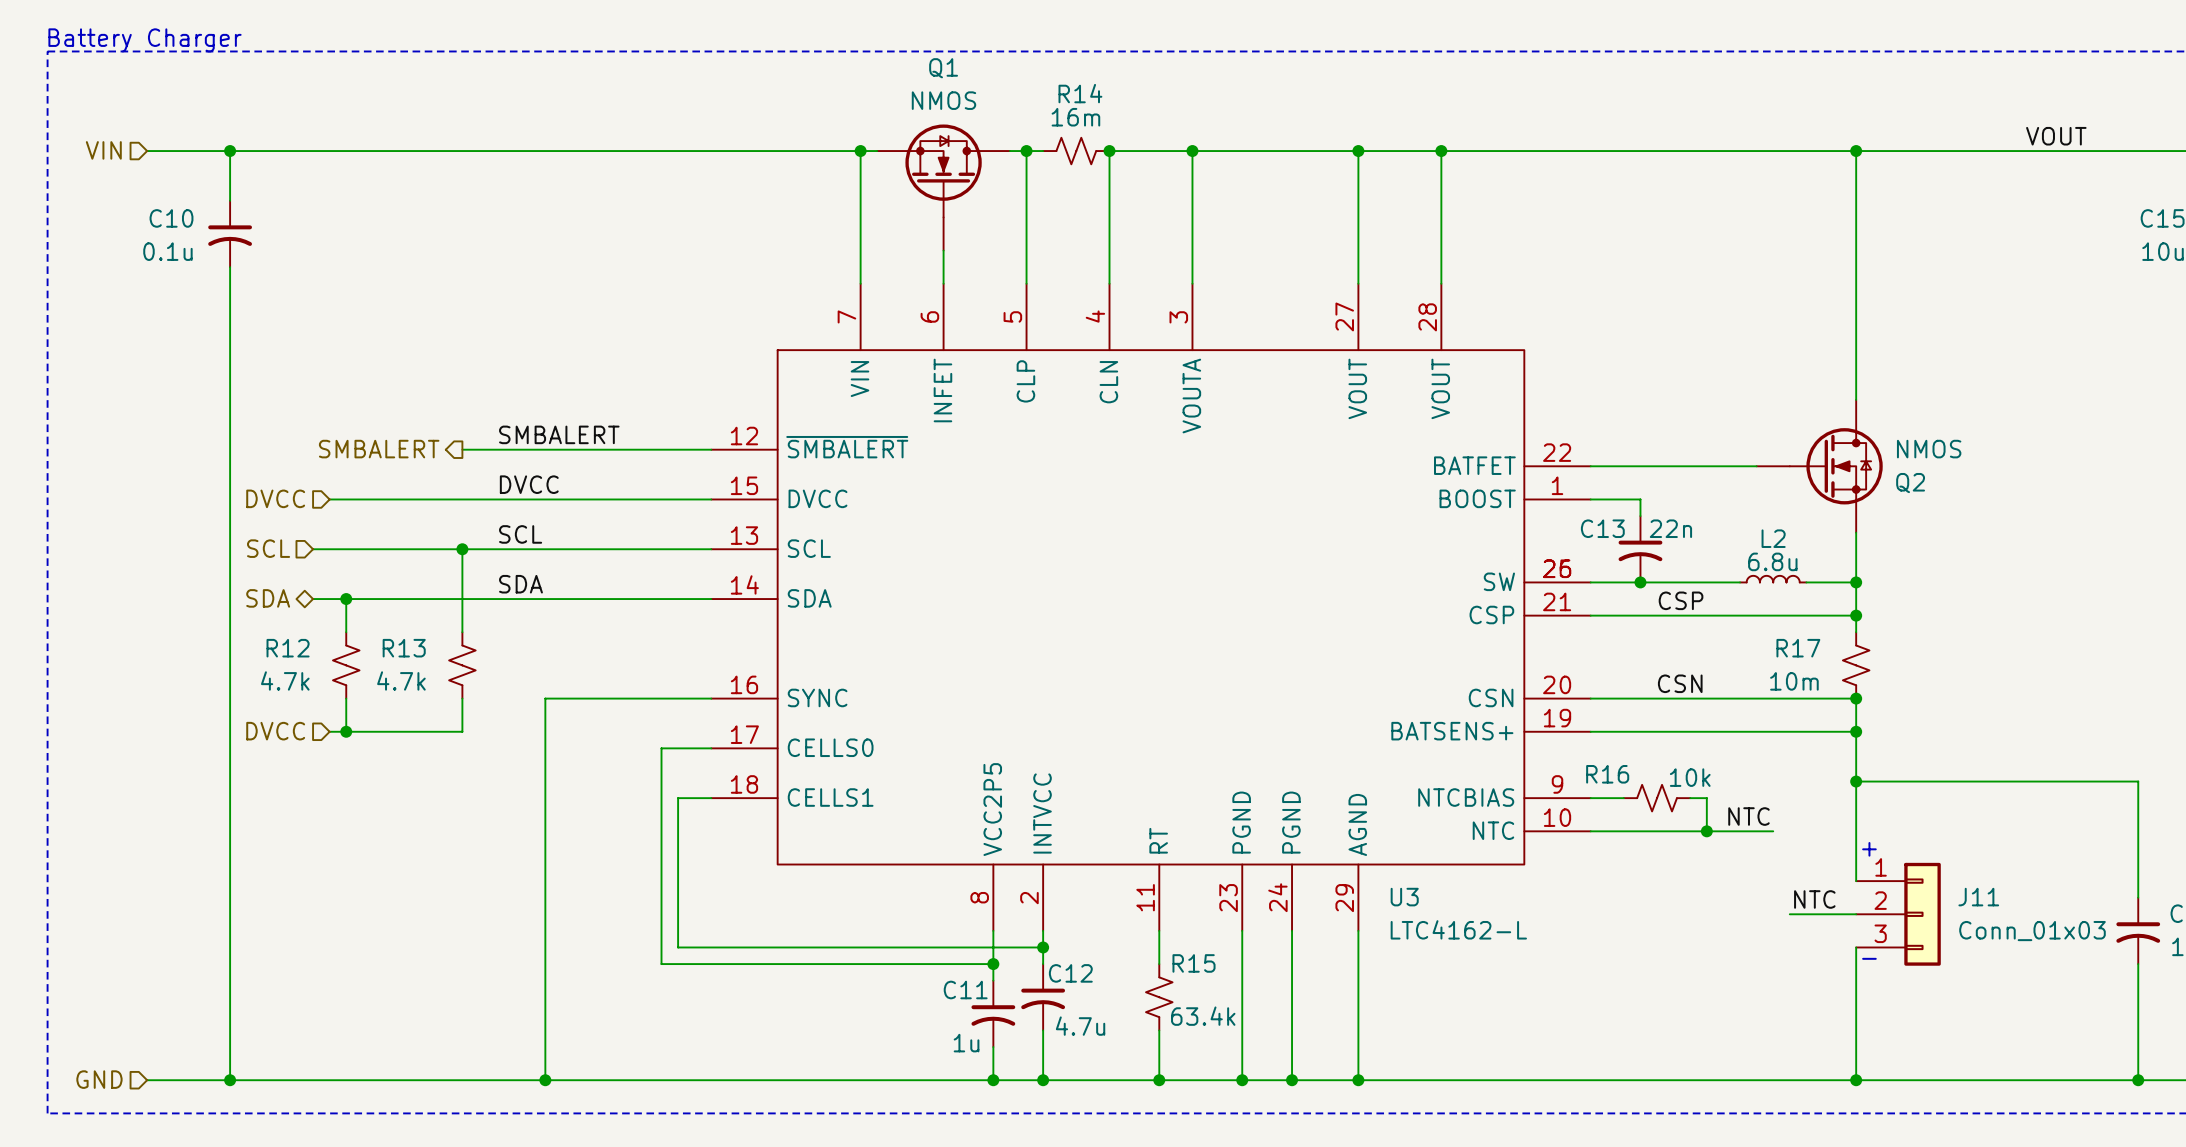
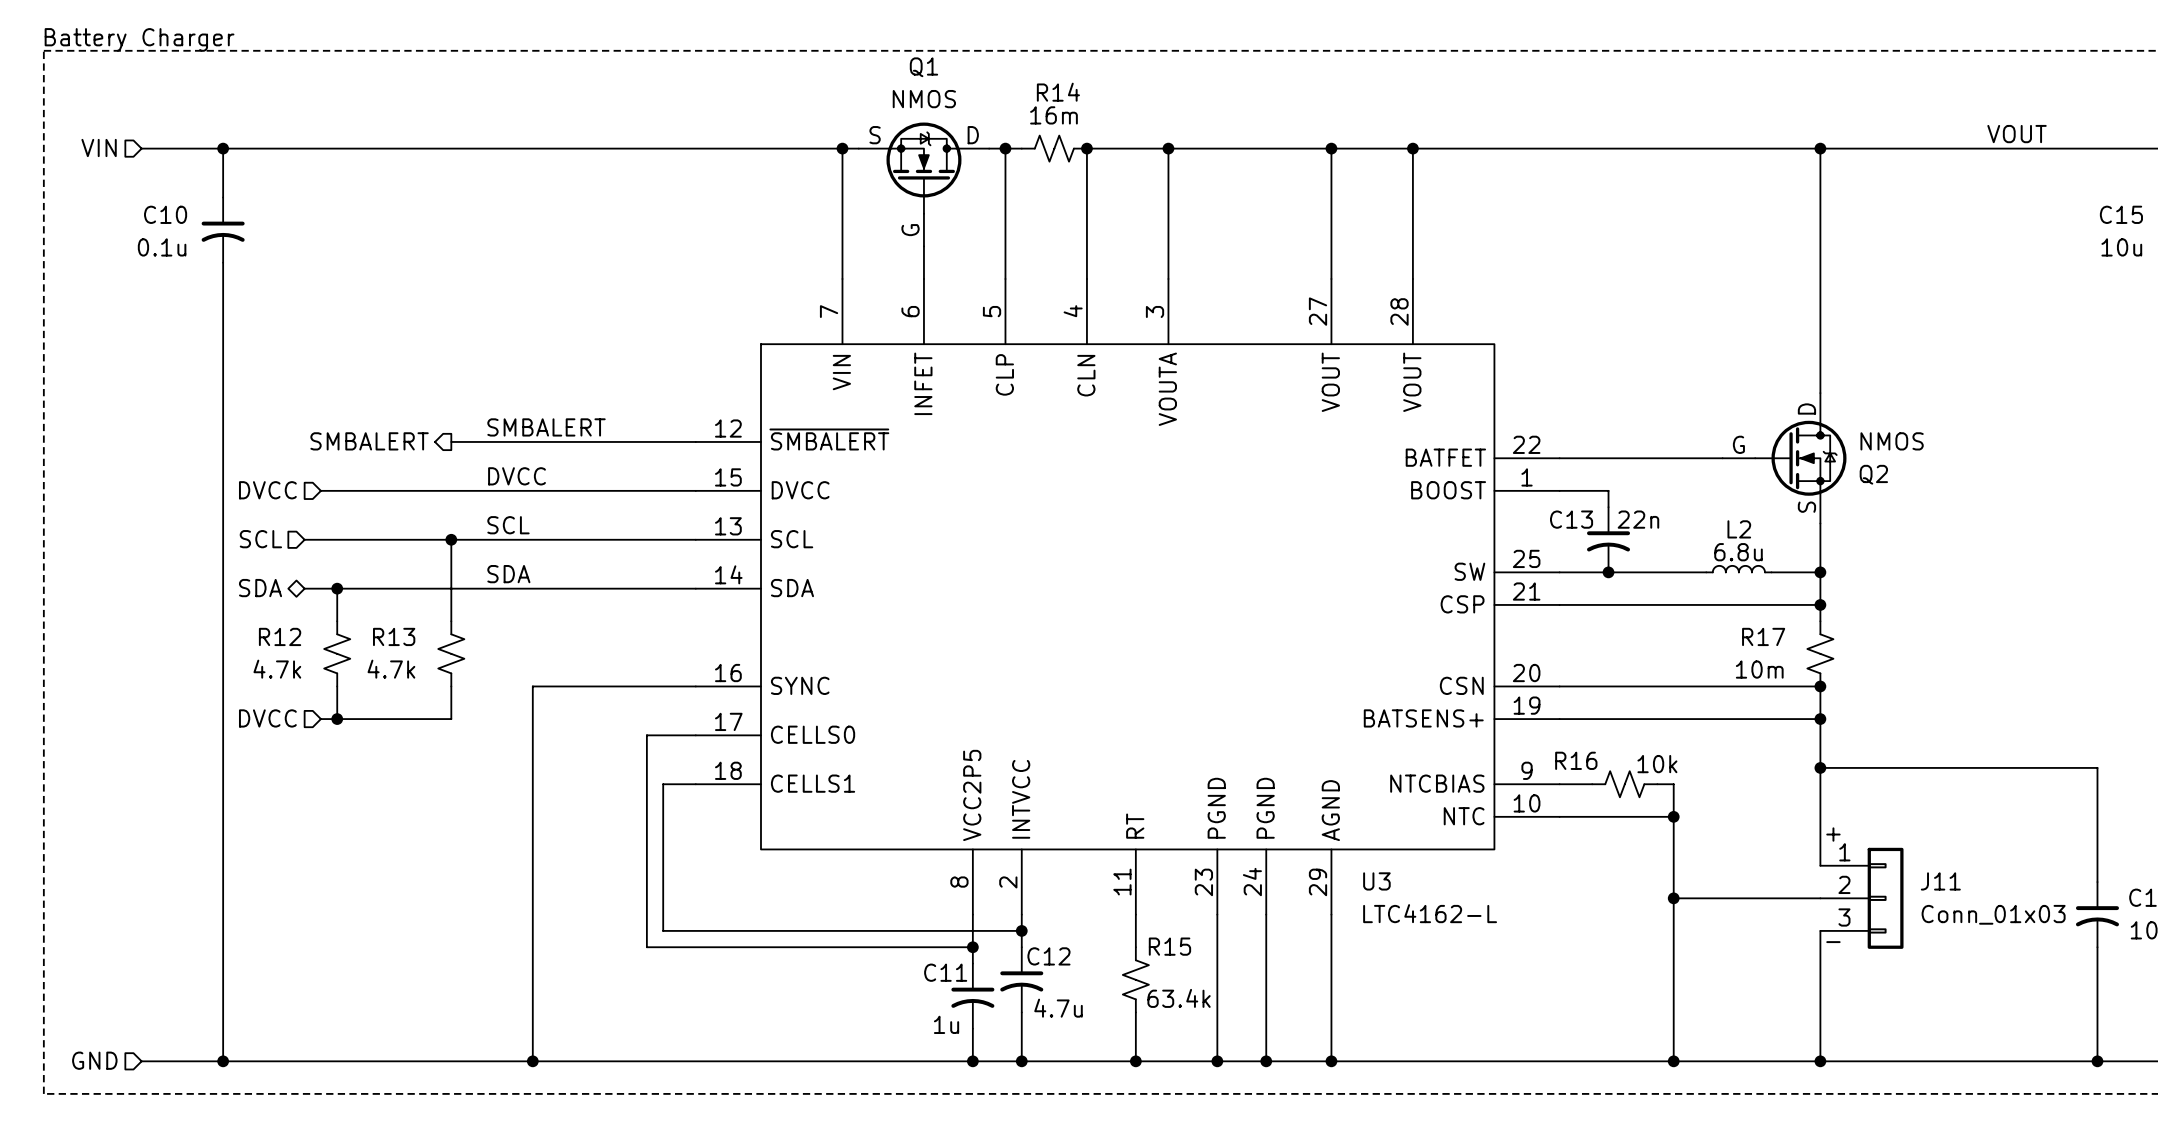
Q1 symbol: [877, 124, 1010, 251] -> [858, 122, 990, 247]
U3 symbol: [711, 283, 1591, 931] -> [695, 278, 1560, 915]
Q2 symbol: [1756, 399, 1883, 533] -> [1722, 393, 1847, 524]
label: CSP (1681, 600) -> none
label: CSN (1680, 683) -> none
label: NTC (1748, 816) -> none
wire: (1706, 831) (1773, 831) -> (1673, 816) (1673, 1061)
label: NTC (1814, 899) -> none
wire: none -> (1673, 898) (1755, 898)
junction: none -> (1673, 898)
junction: none -> (1673, 1061)

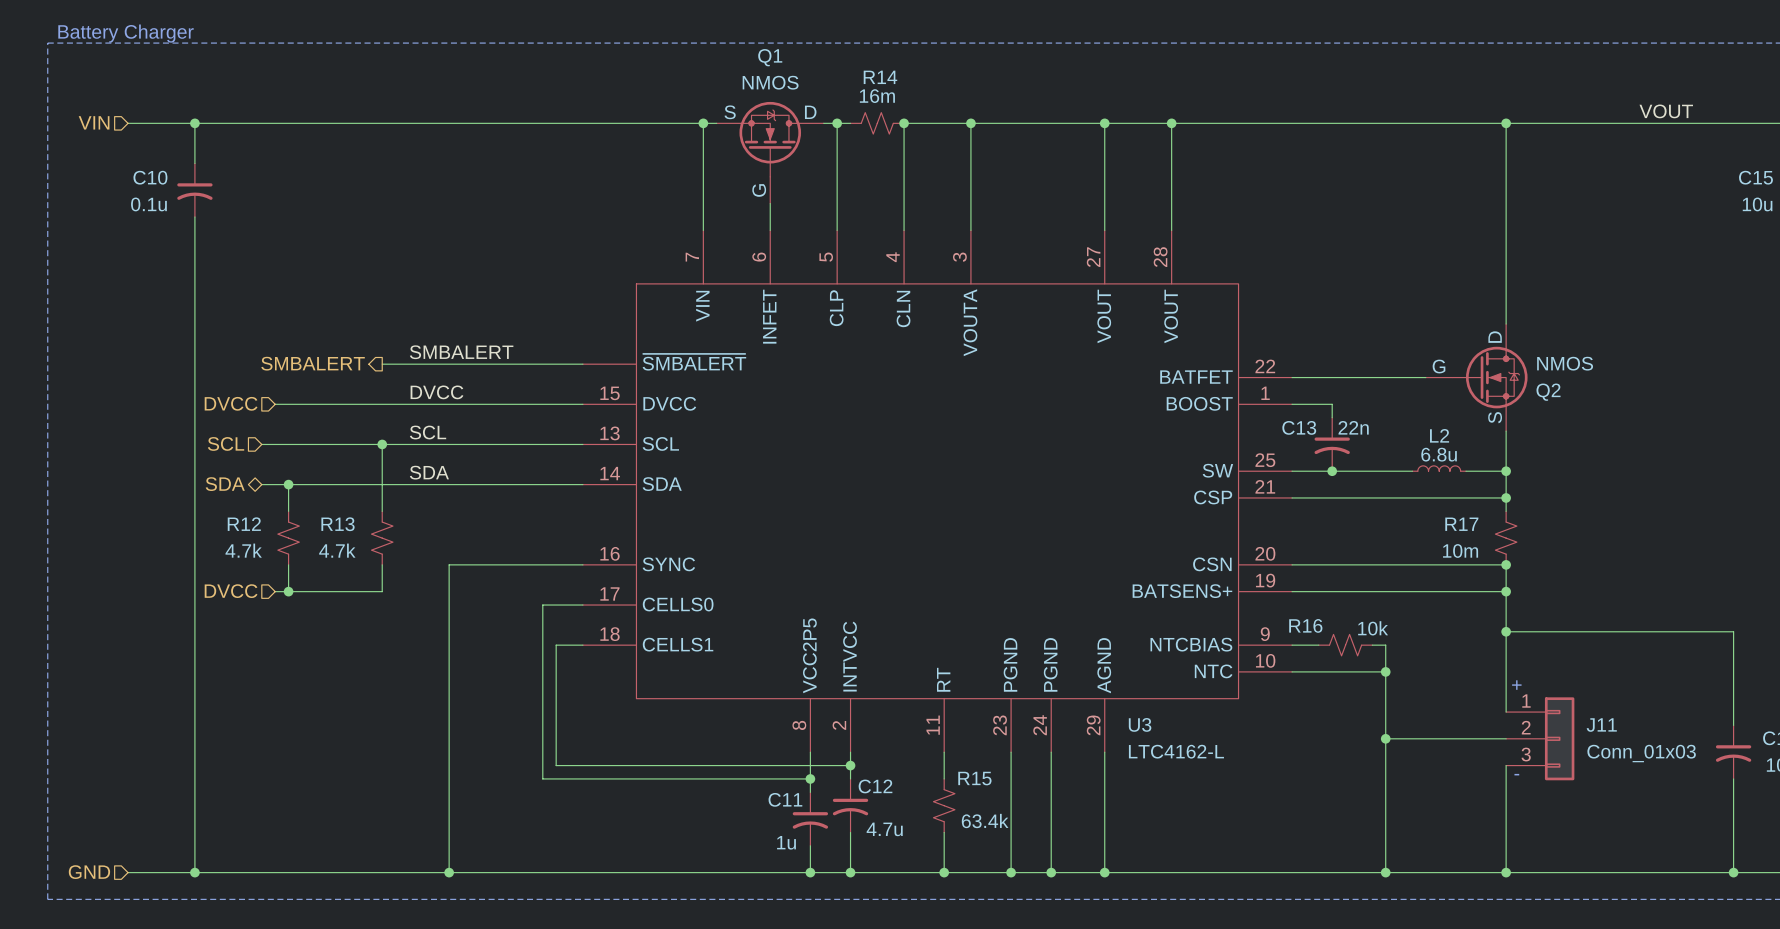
U3 pin number: 12 (728, 428) -> none

